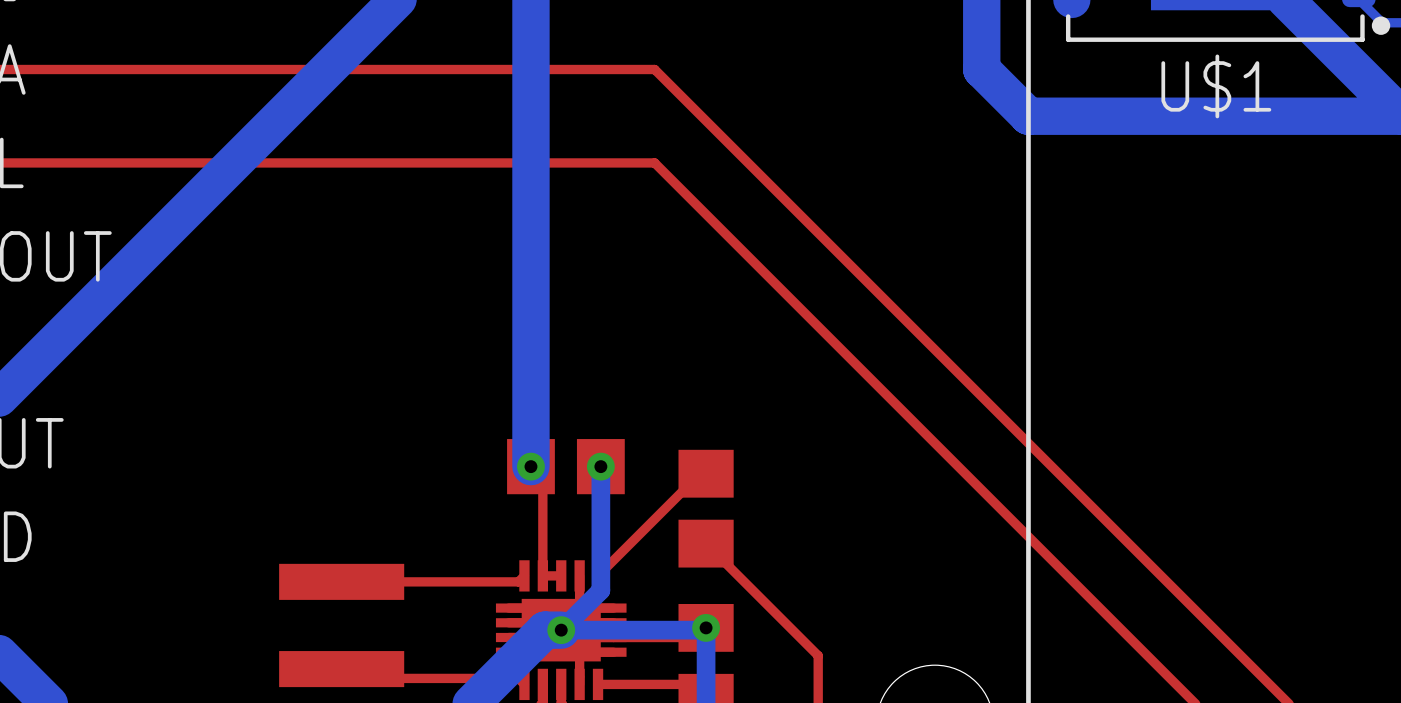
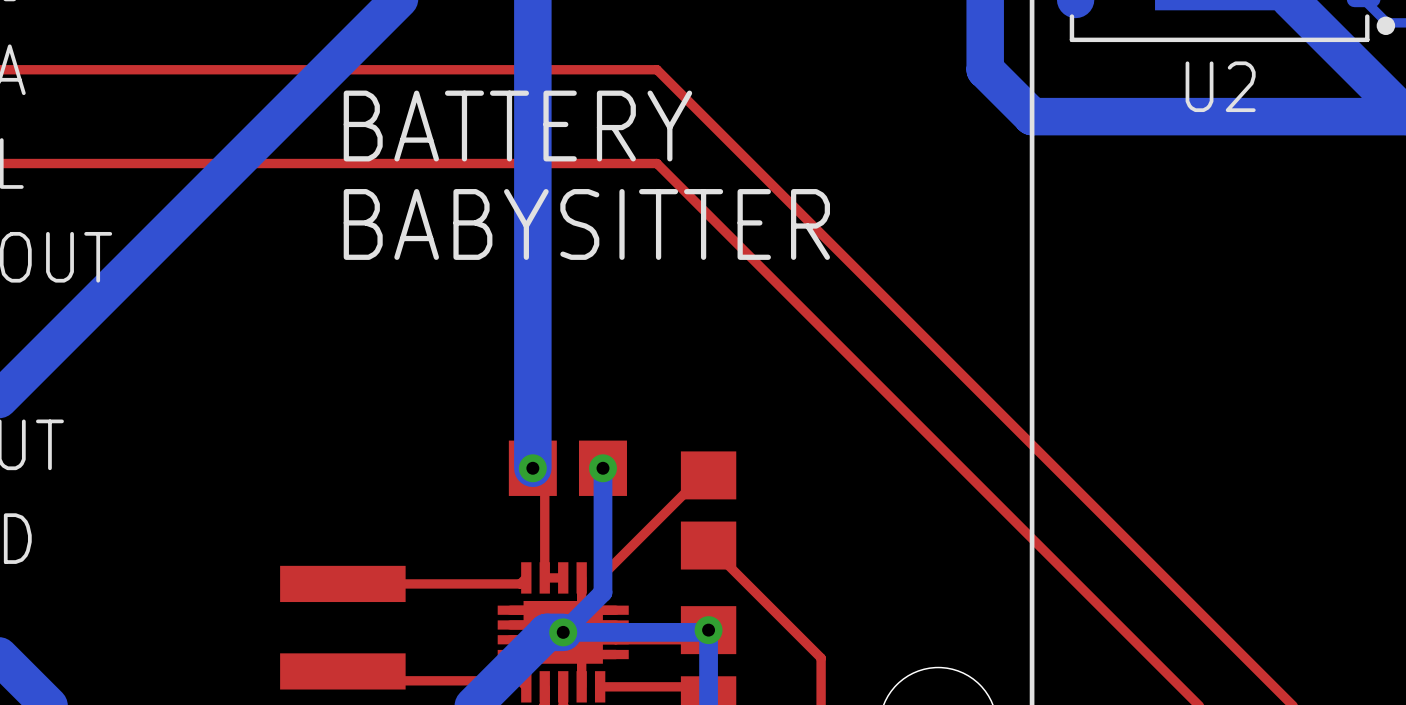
U$1 name: U$1 (1216, 86) -> U2 (1220, 86)
text: none -> BATTERY (517, 126)
text: none -> BABYSITTER (586, 224)

